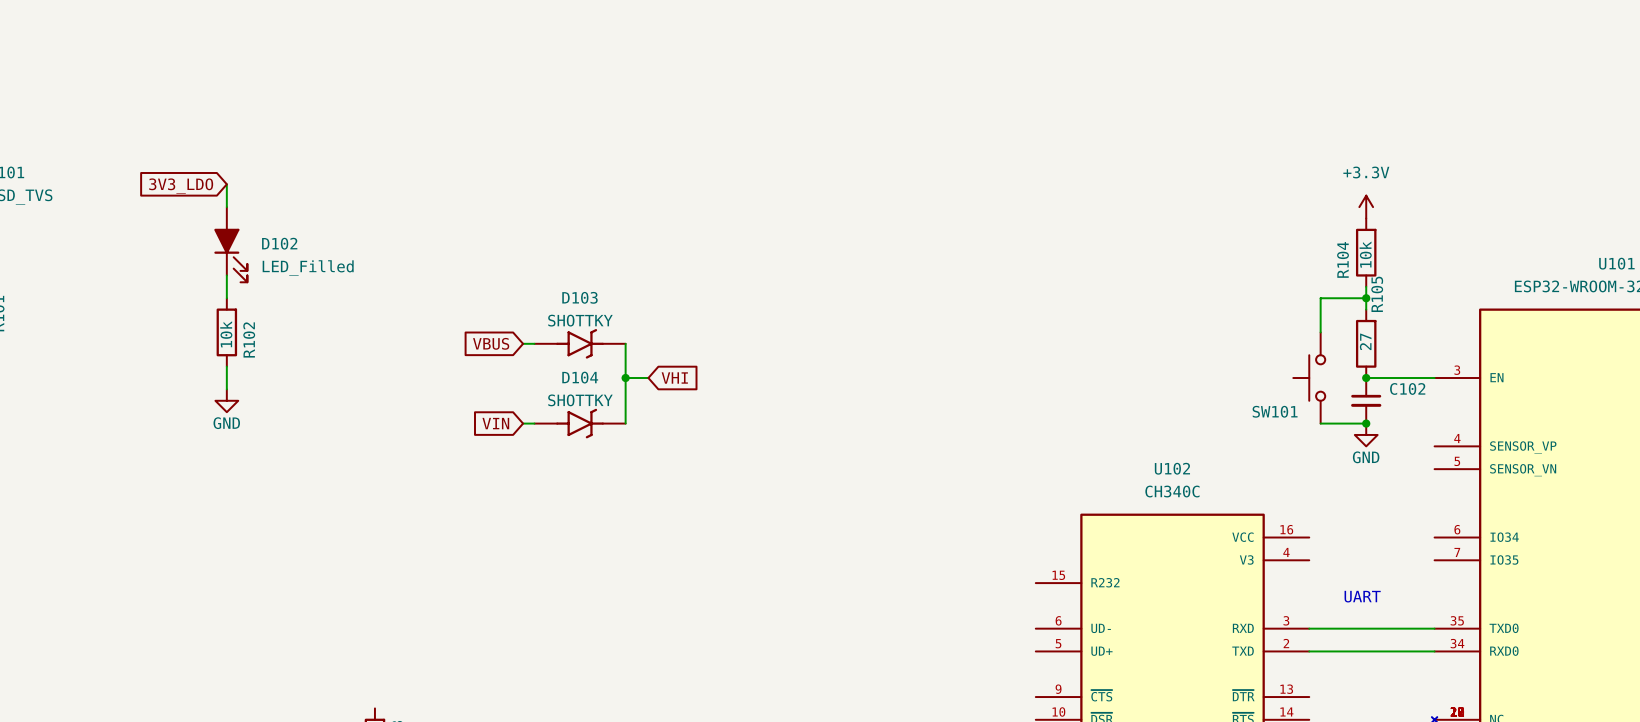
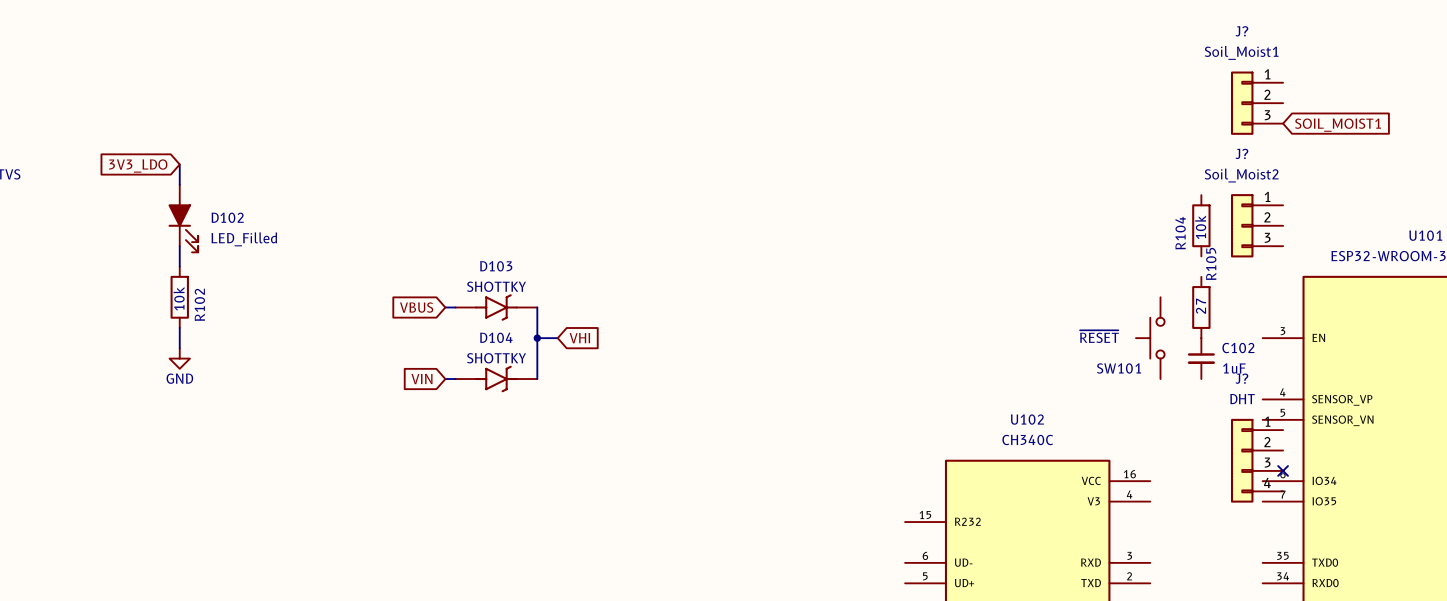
J?: none -> Soil_Moist1 (1257, 103)
global label: none -> SOIL_MOIST1 (1338, 125)
power symbol: +3.3V (1366, 207) -> none
J?: none -> Soil_Moist2 (1257, 225)
wire: (1366, 286) (1366, 309) -> none
wire: (1366, 298) (1320, 298) (1320, 332) -> none
junction: (1366, 298) -> none
SW101 value: none -> ~{RESET} (1099, 336)
wire: (1366, 378) (1434, 378) -> none
junction: (1366, 378) -> none
C102 value: none -> 1uF (1234, 368)
wire: (1320, 423) (1366, 423) -> none
junction: (1366, 423) -> none
power symbol: GND (1366, 434) -> none
J?: none -> DHT (1257, 460)
no-connect mark: none -> (1283, 470)
text: UART (1362, 596) -> none
wire: (1309, 628) (1434, 628) -> none
wire: (1309, 651) (1434, 651) -> none

